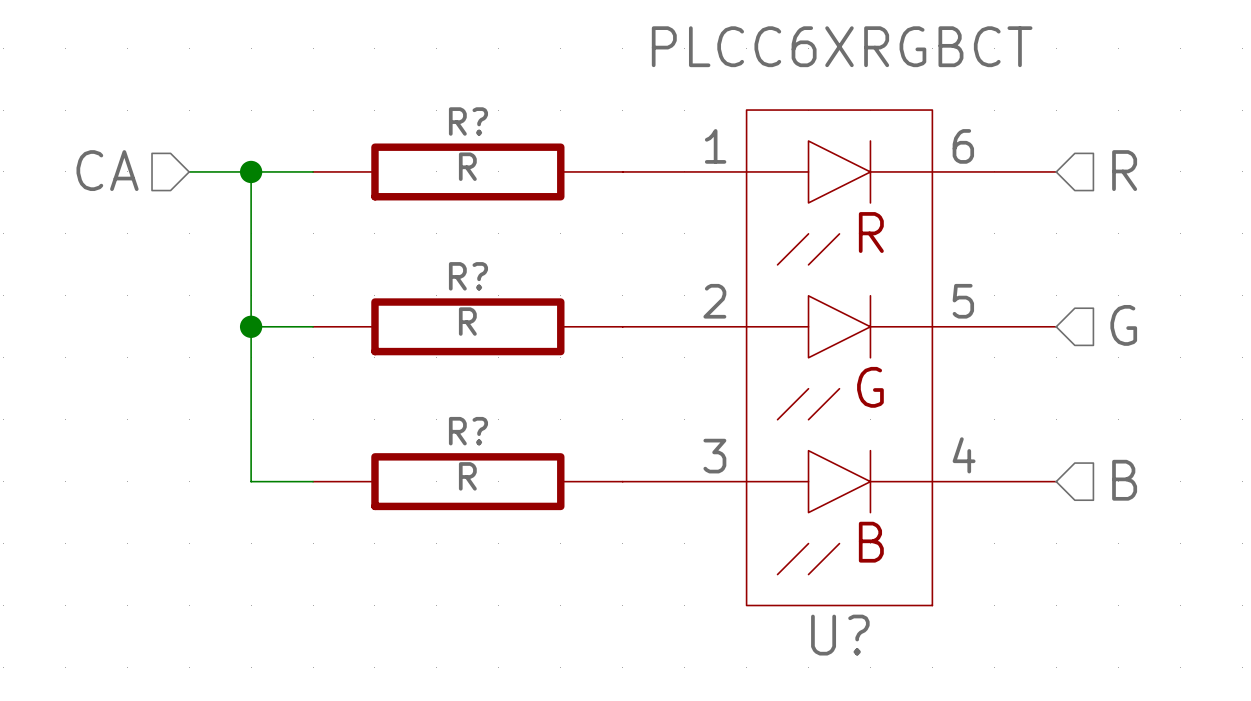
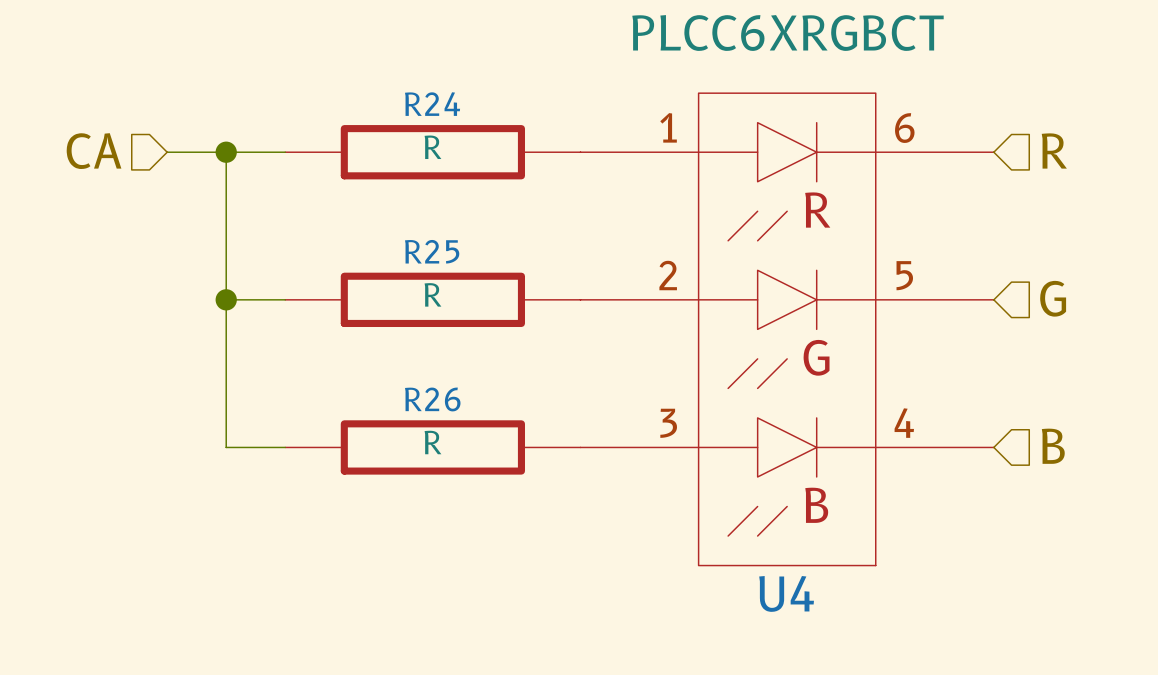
R? name: R? (468, 121) -> R24 (432, 104)
R? name: R? (468, 276) -> R25 (432, 251)
R? name: R? (468, 431) -> R26 (432, 399)
U? name: U? (840, 635) -> U4 (786, 593)

